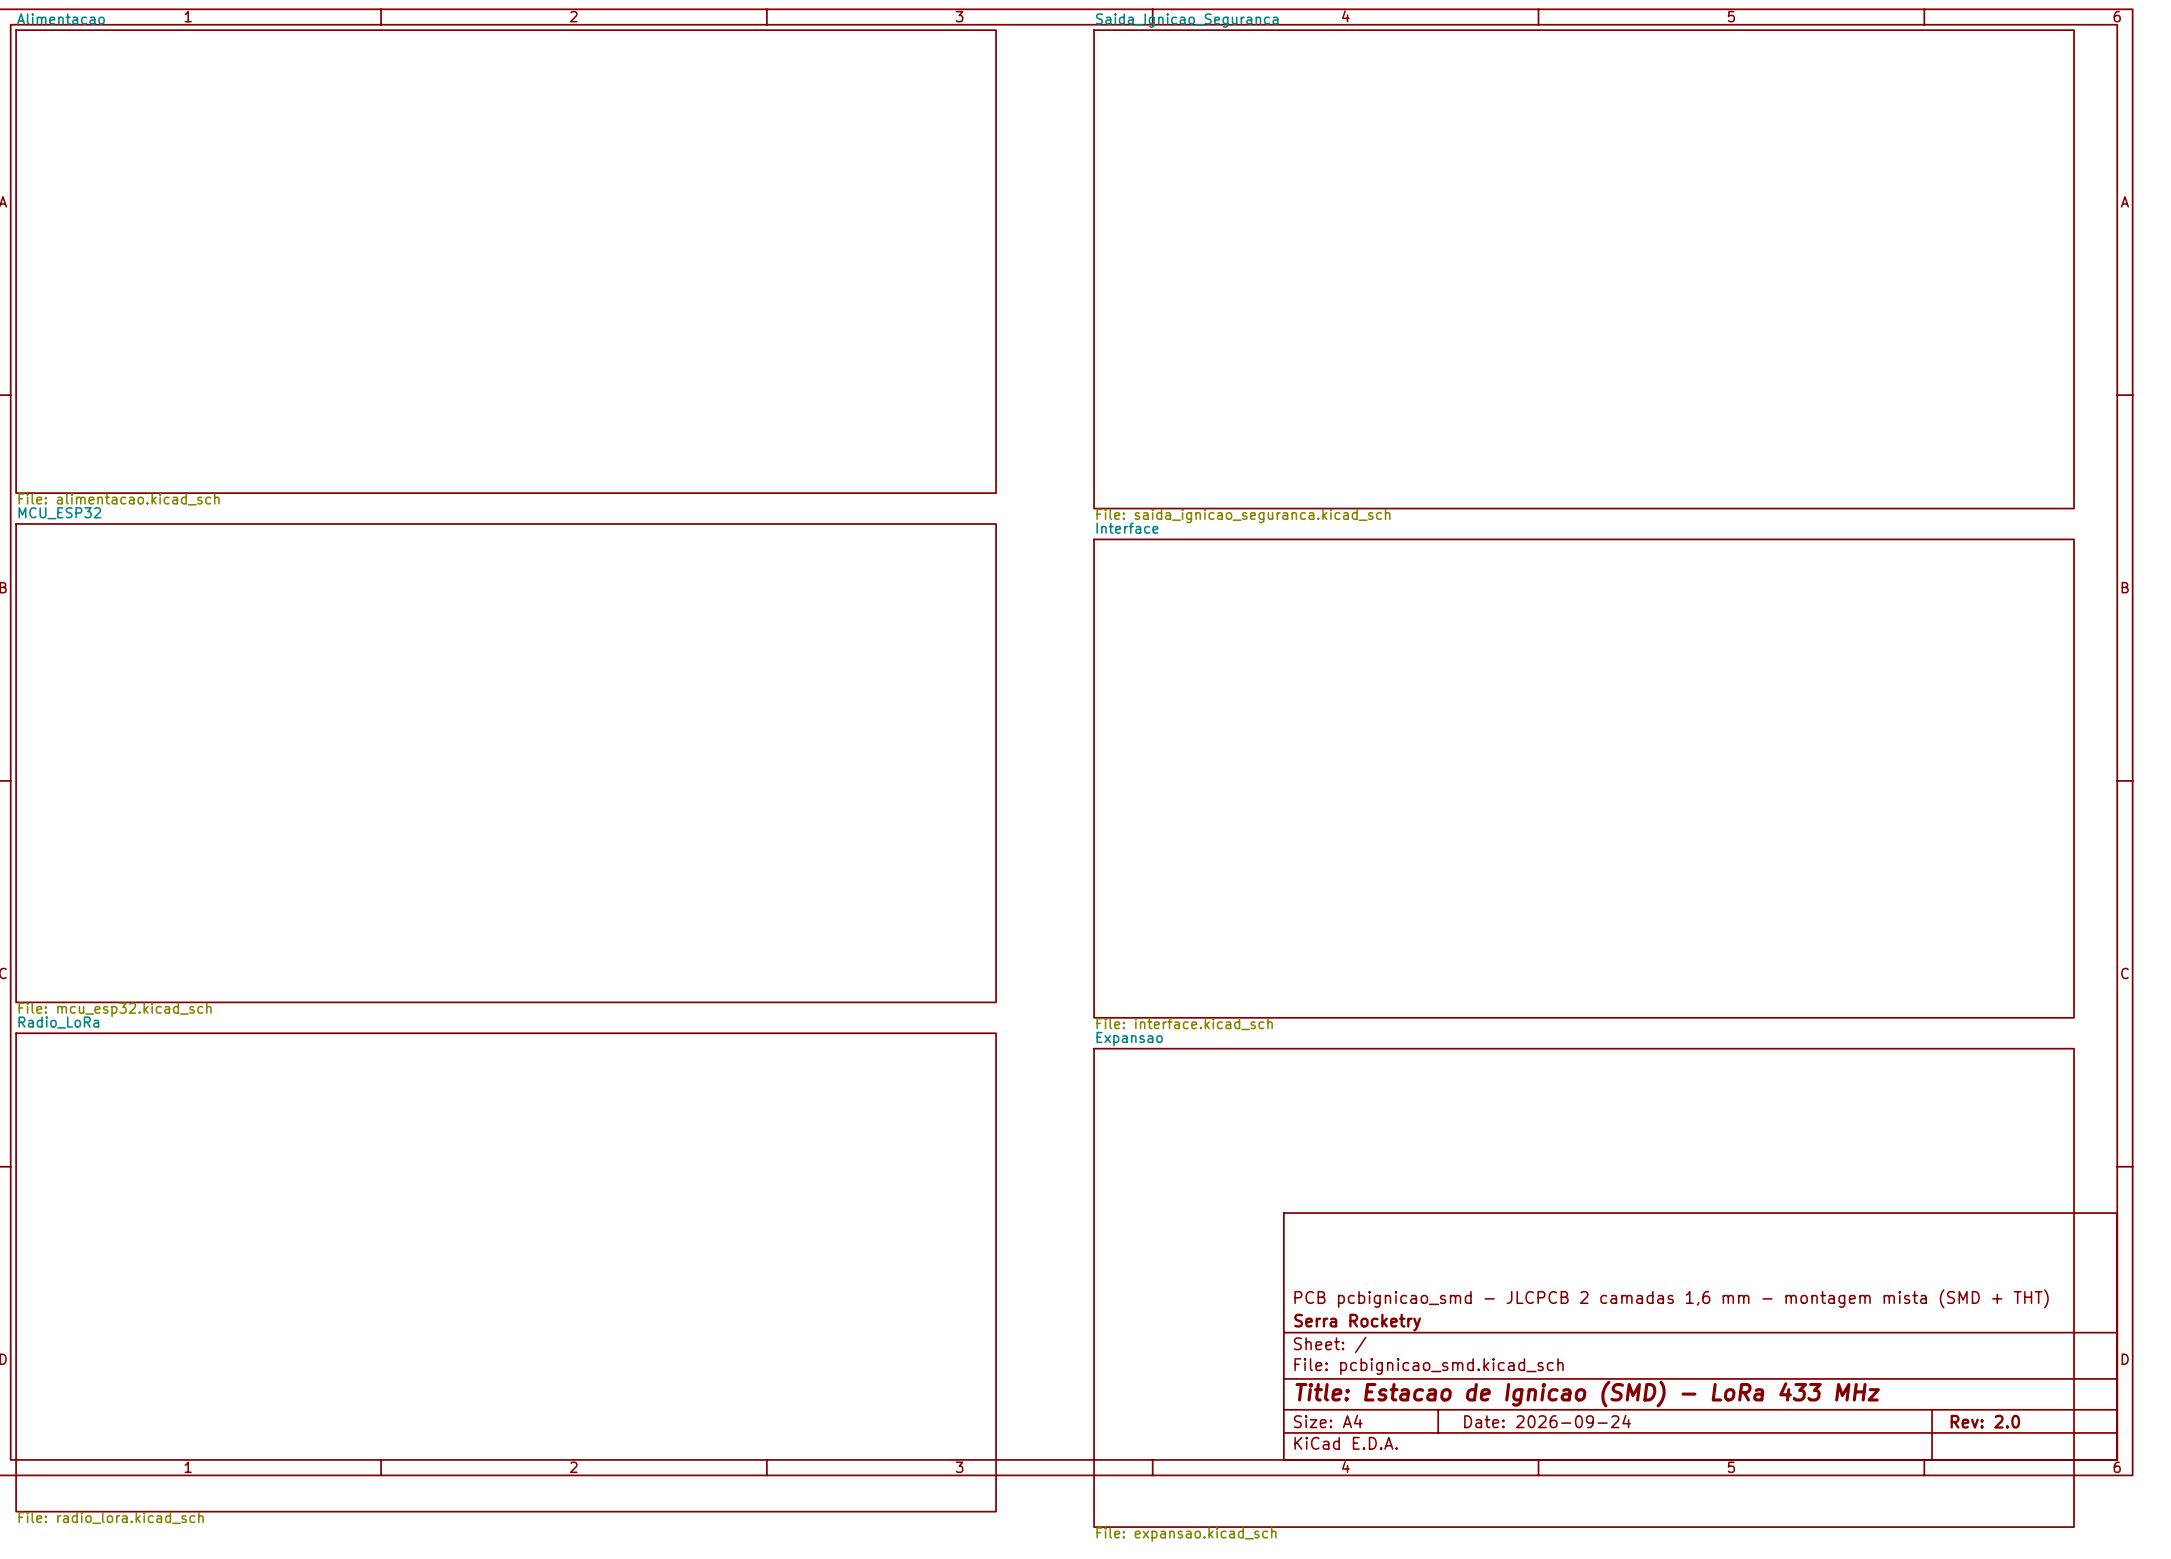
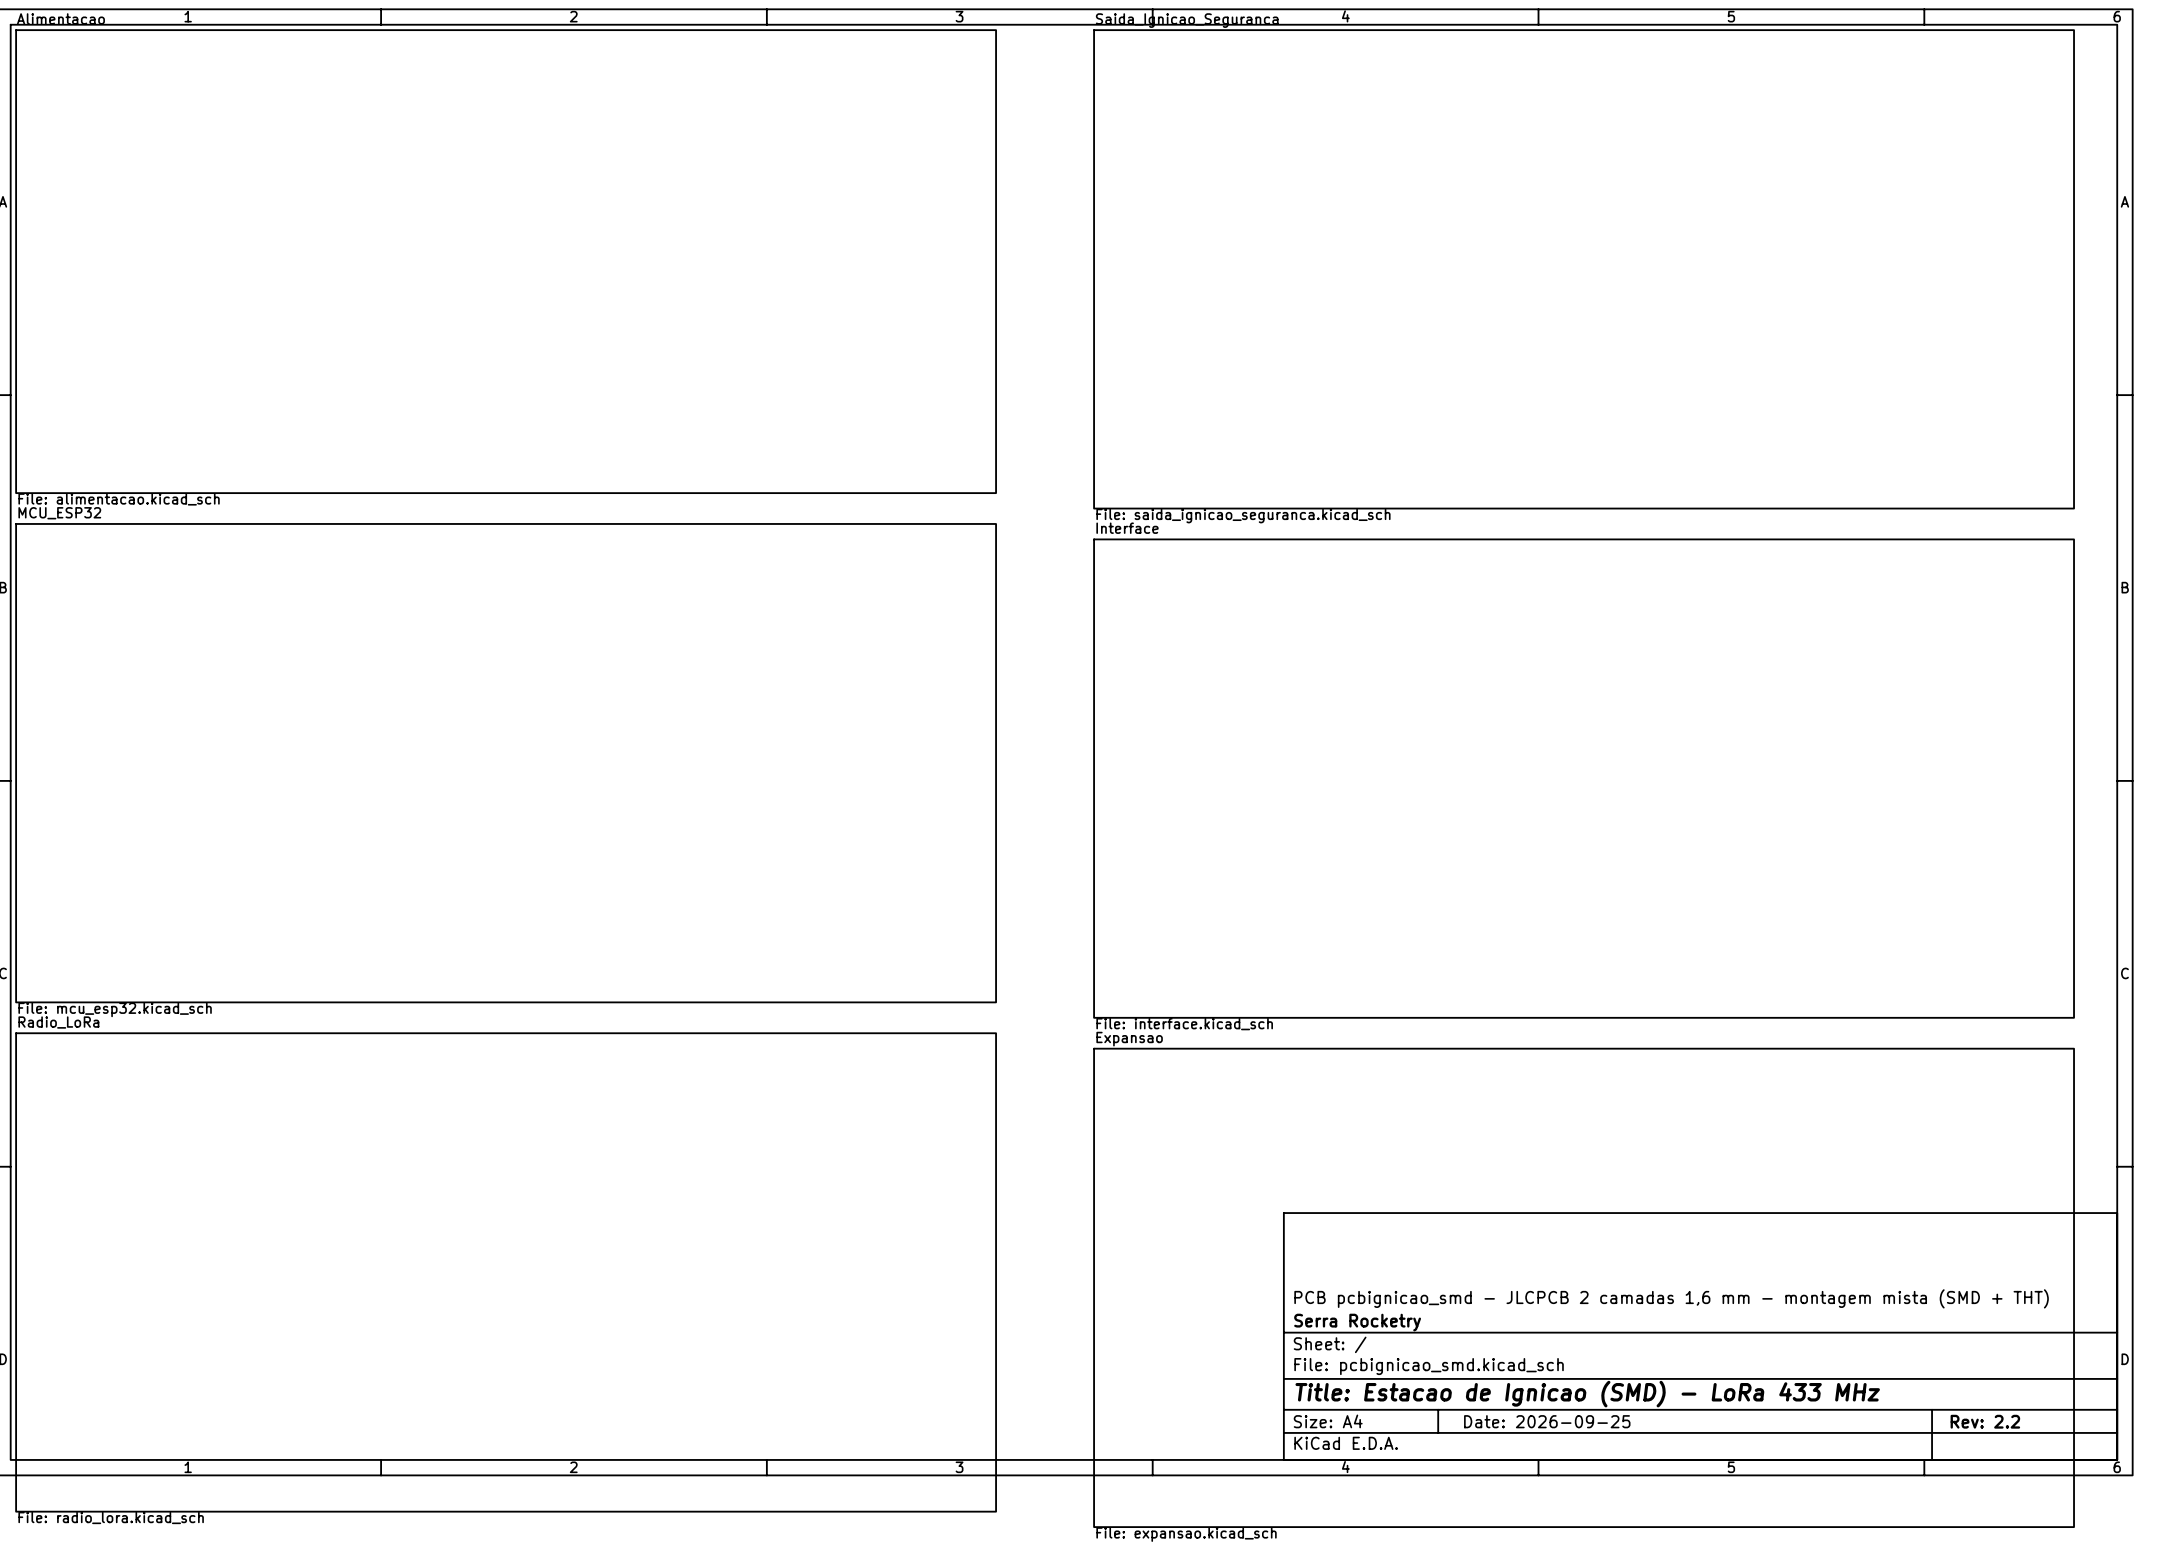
title block: Date: 2026-09-24 (1547, 1421) -> Date: 2026-09-25 (1547, 1421)
title block: Rev: 2.0 (1985, 1421) -> Rev: 2.2 (1985, 1421)

